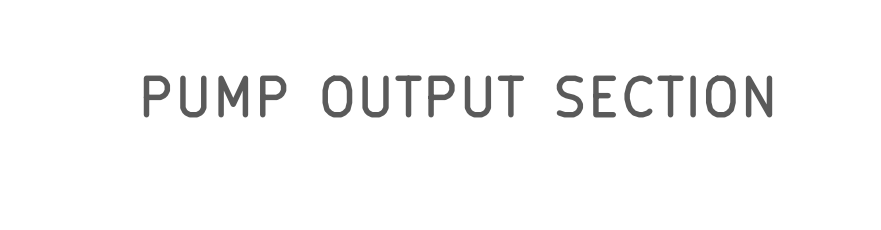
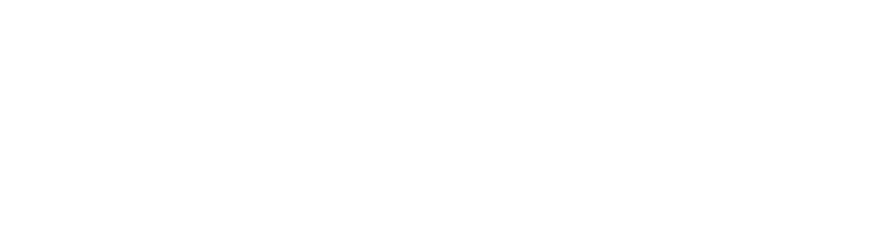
text: PUMP OUTPUT SECTION (457, 96) -> none

